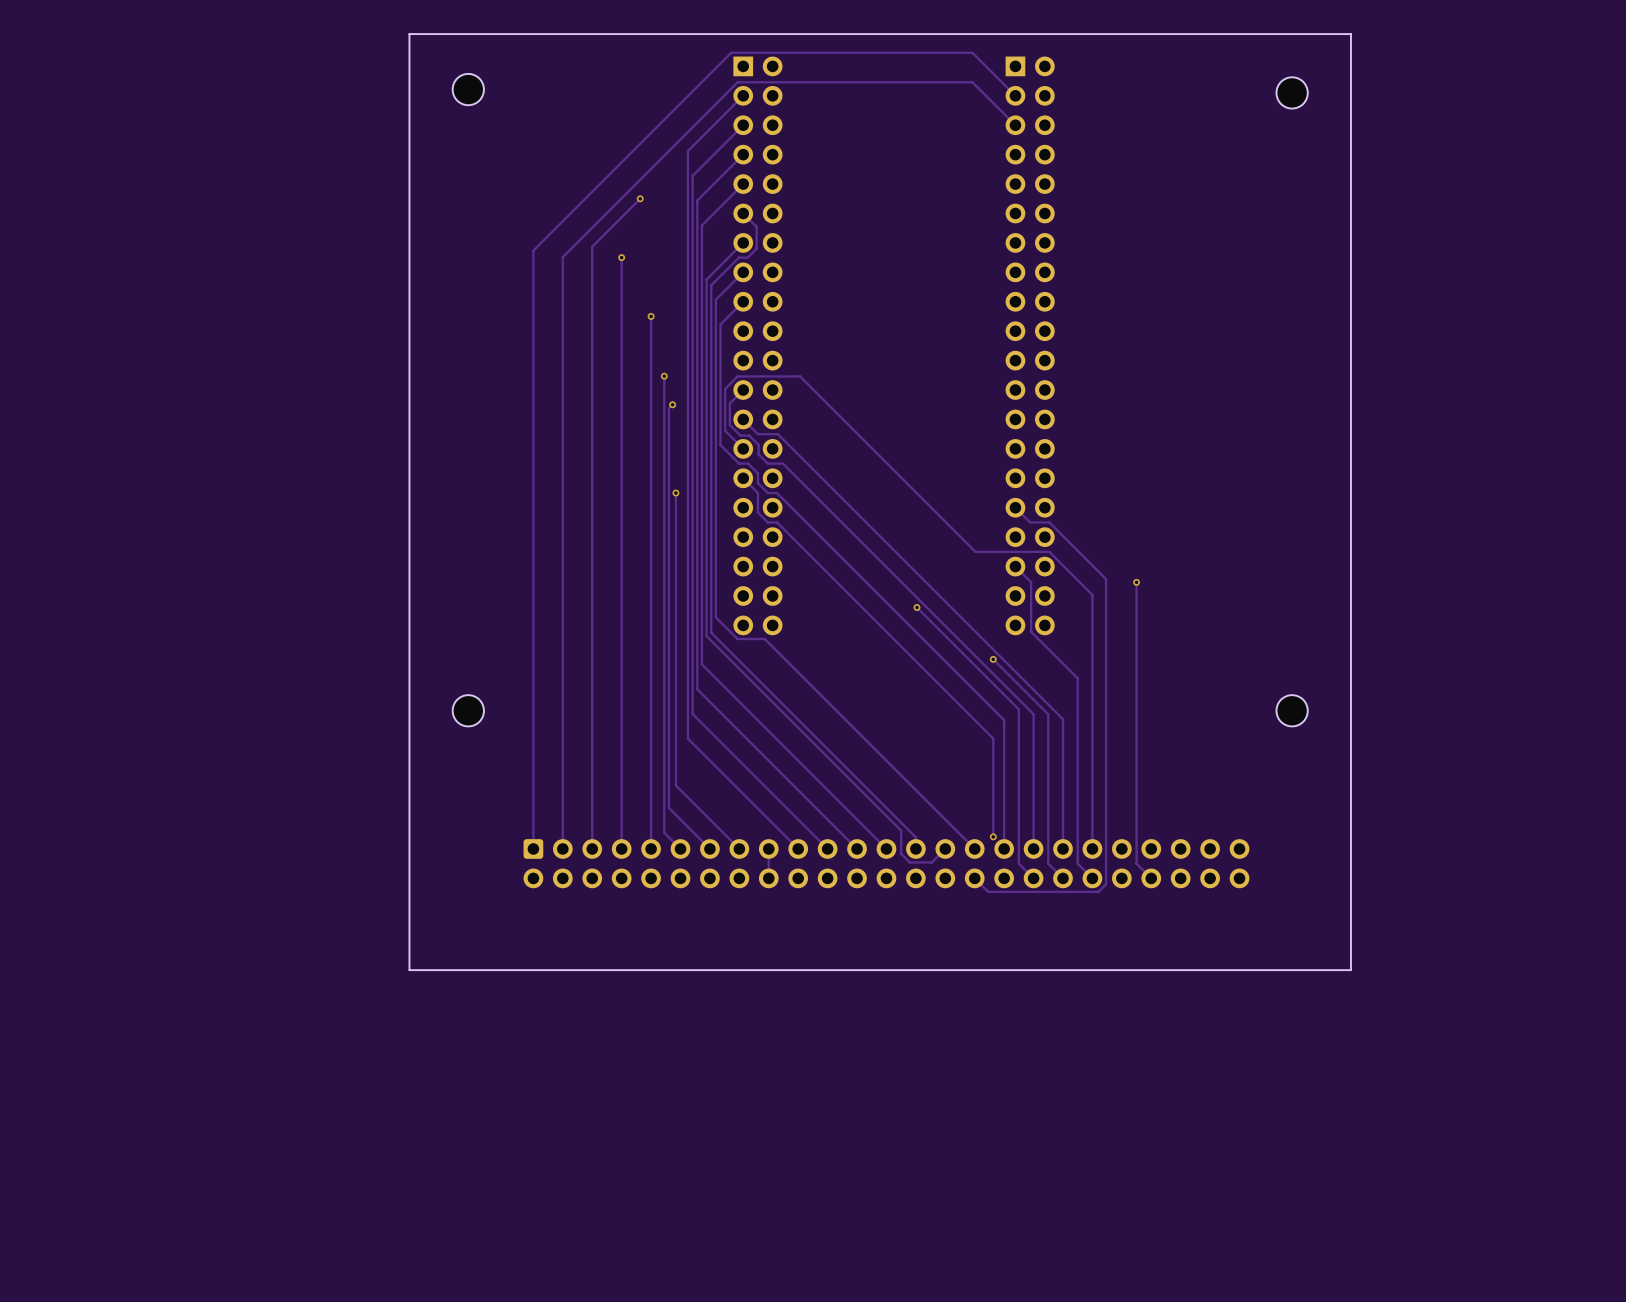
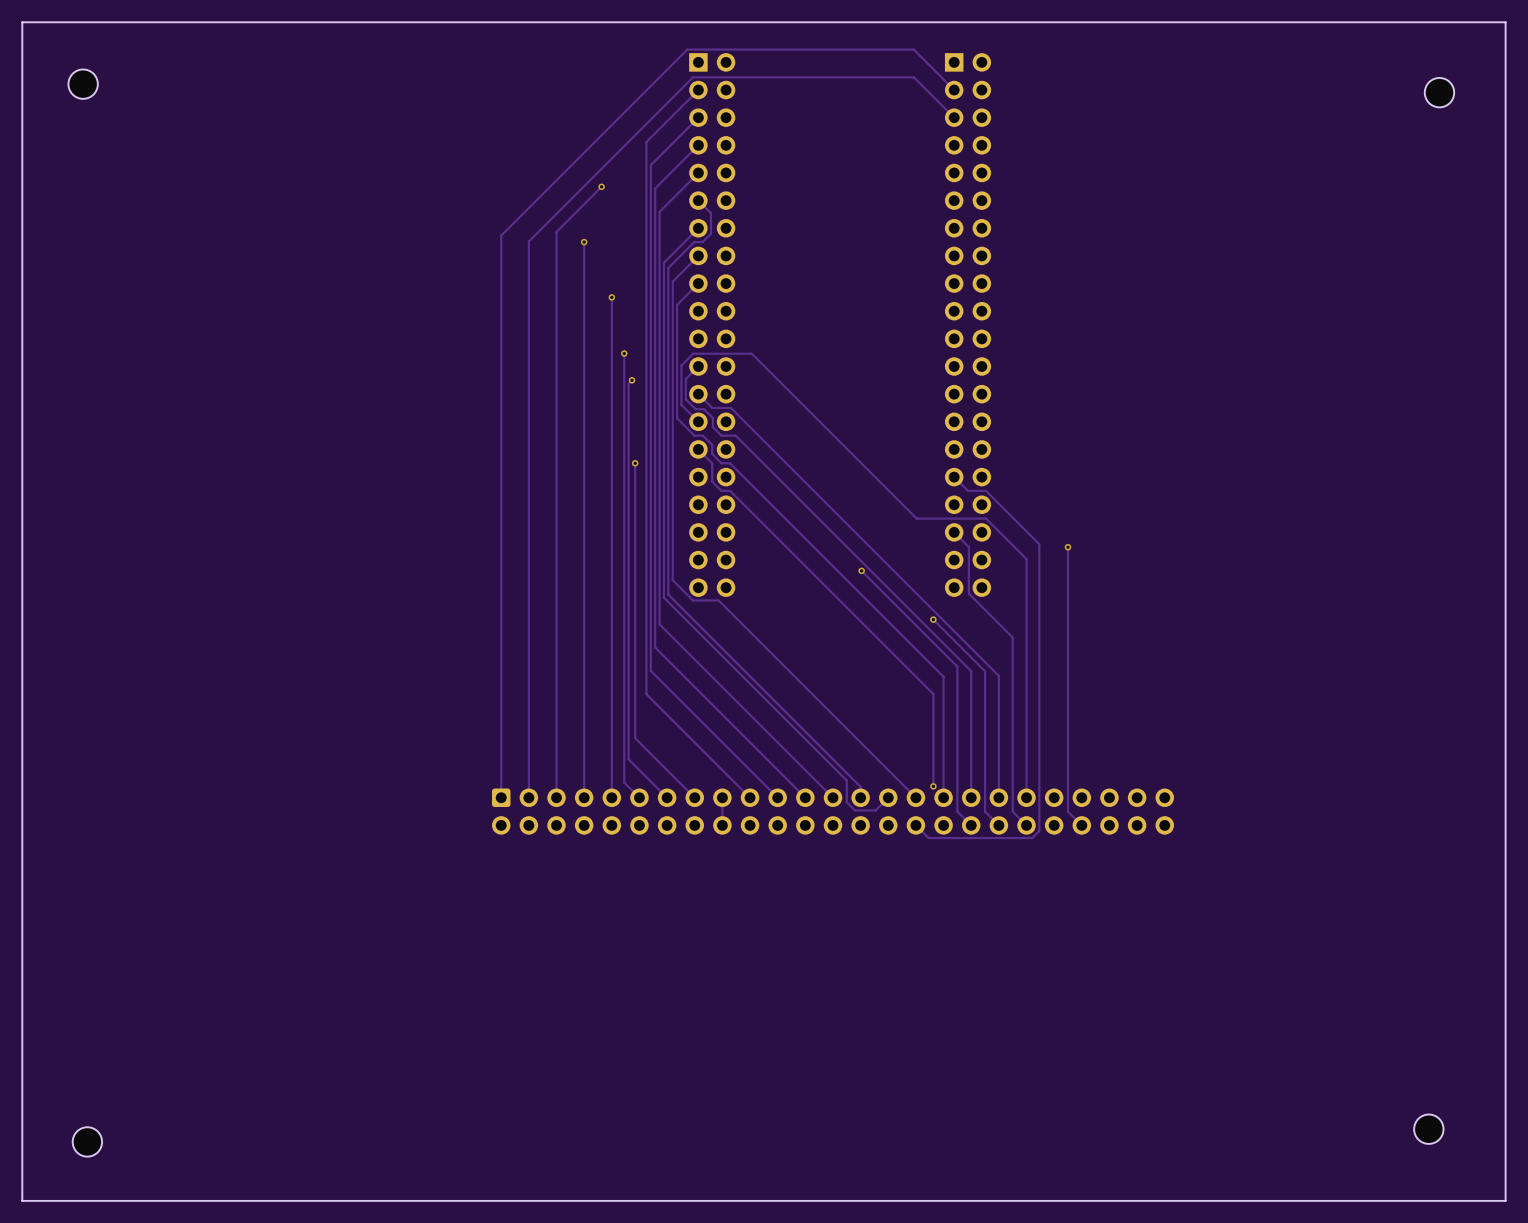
board edge: none -> (1505, 22) (22, 22) (22, 1200) (1505, 1200) (1505, 22)
board edge: (1350, 34) (409, 34) (409, 970) (1350, 970) (1350, 34) -> none
part: none -> (83, 84)
part: (468, 89) -> none
part position: (1292, 92) -> (1439, 92)
part: (468, 710) -> none
part: (1292, 710) -> none
part: none -> (1428, 1129)
part: none -> (87, 1141)

